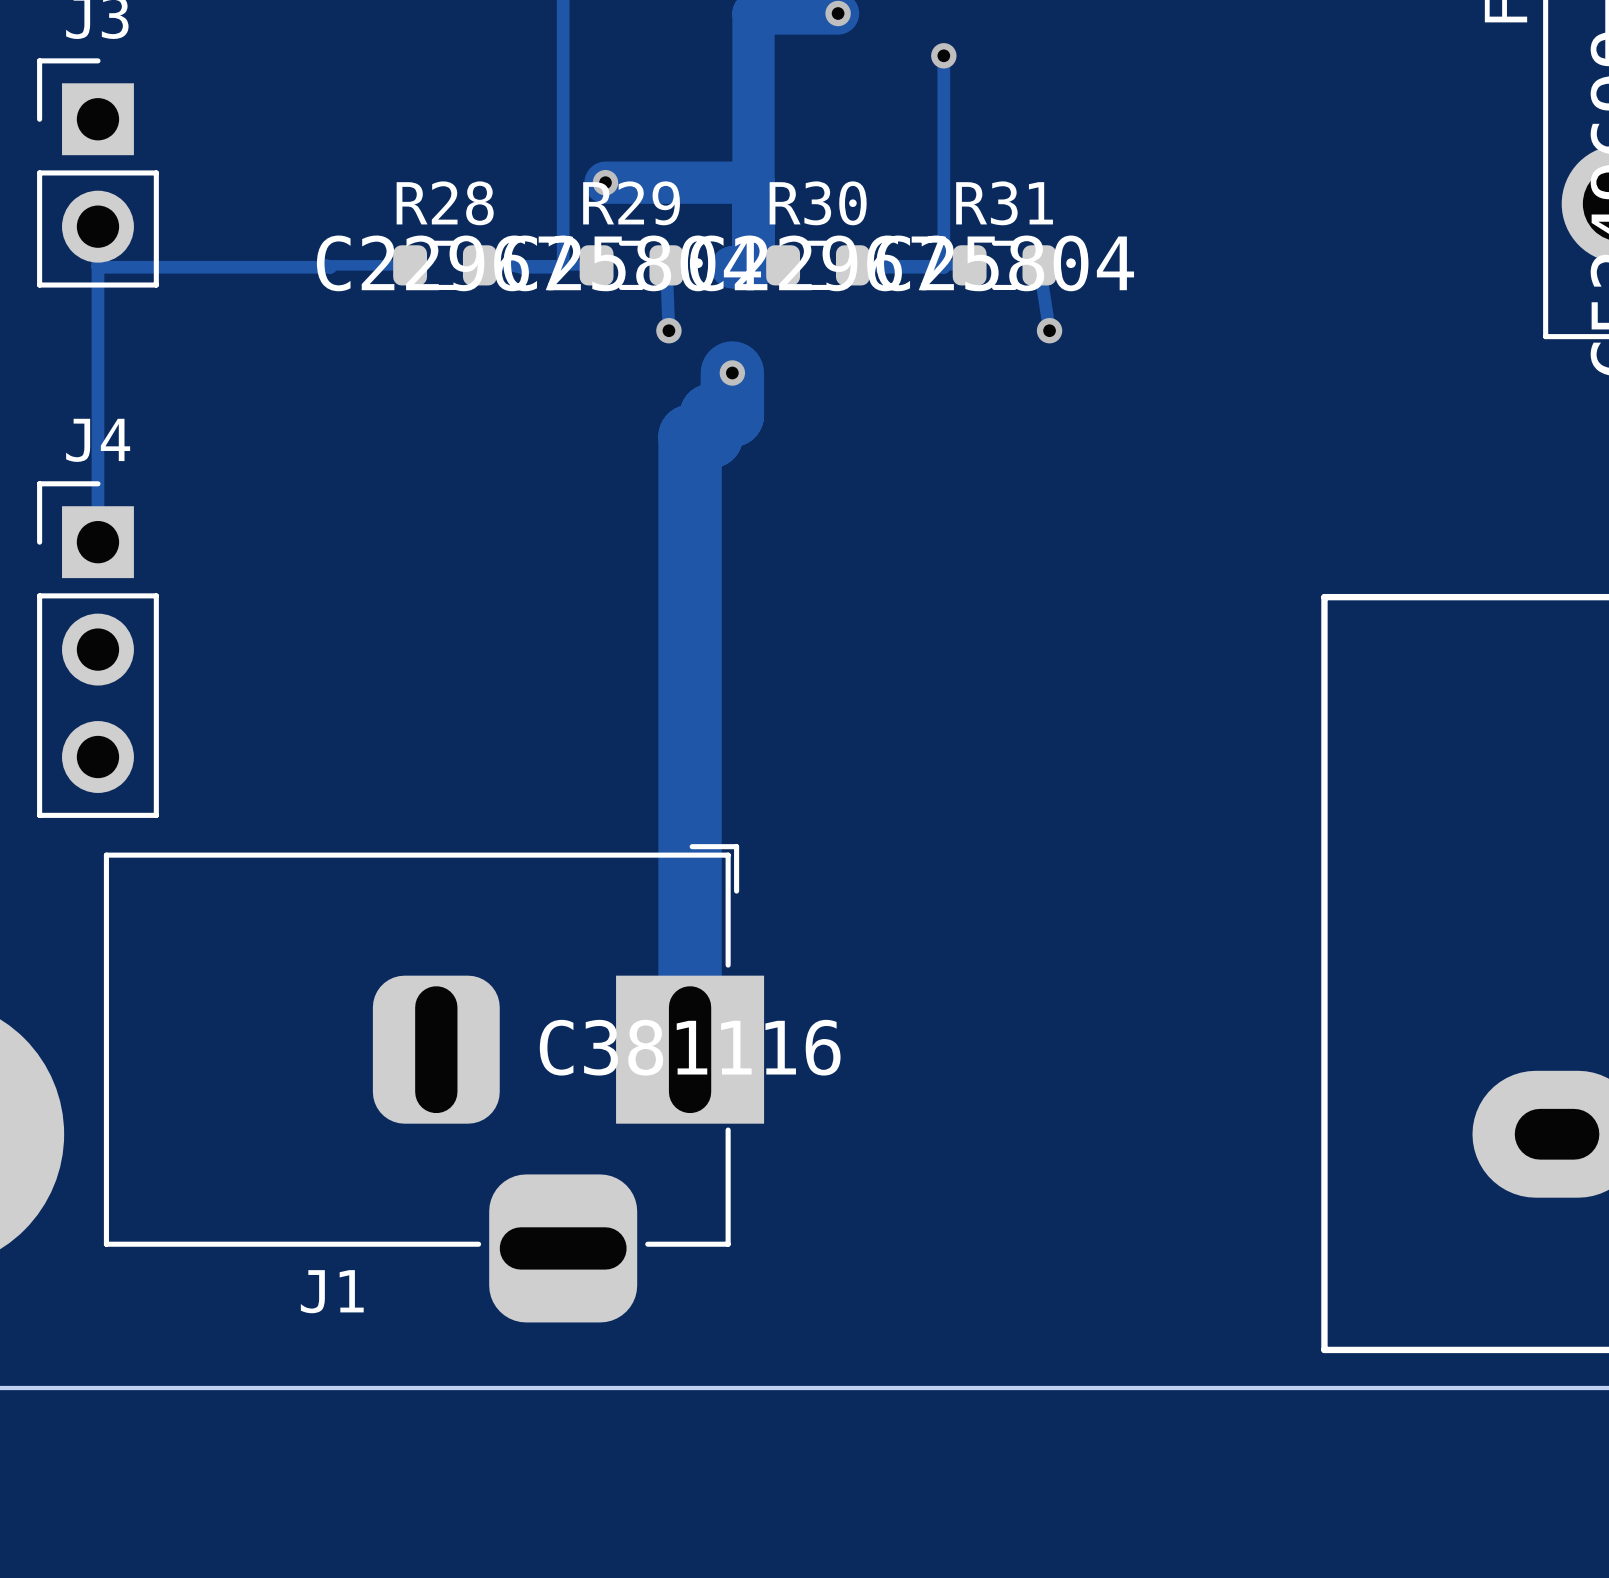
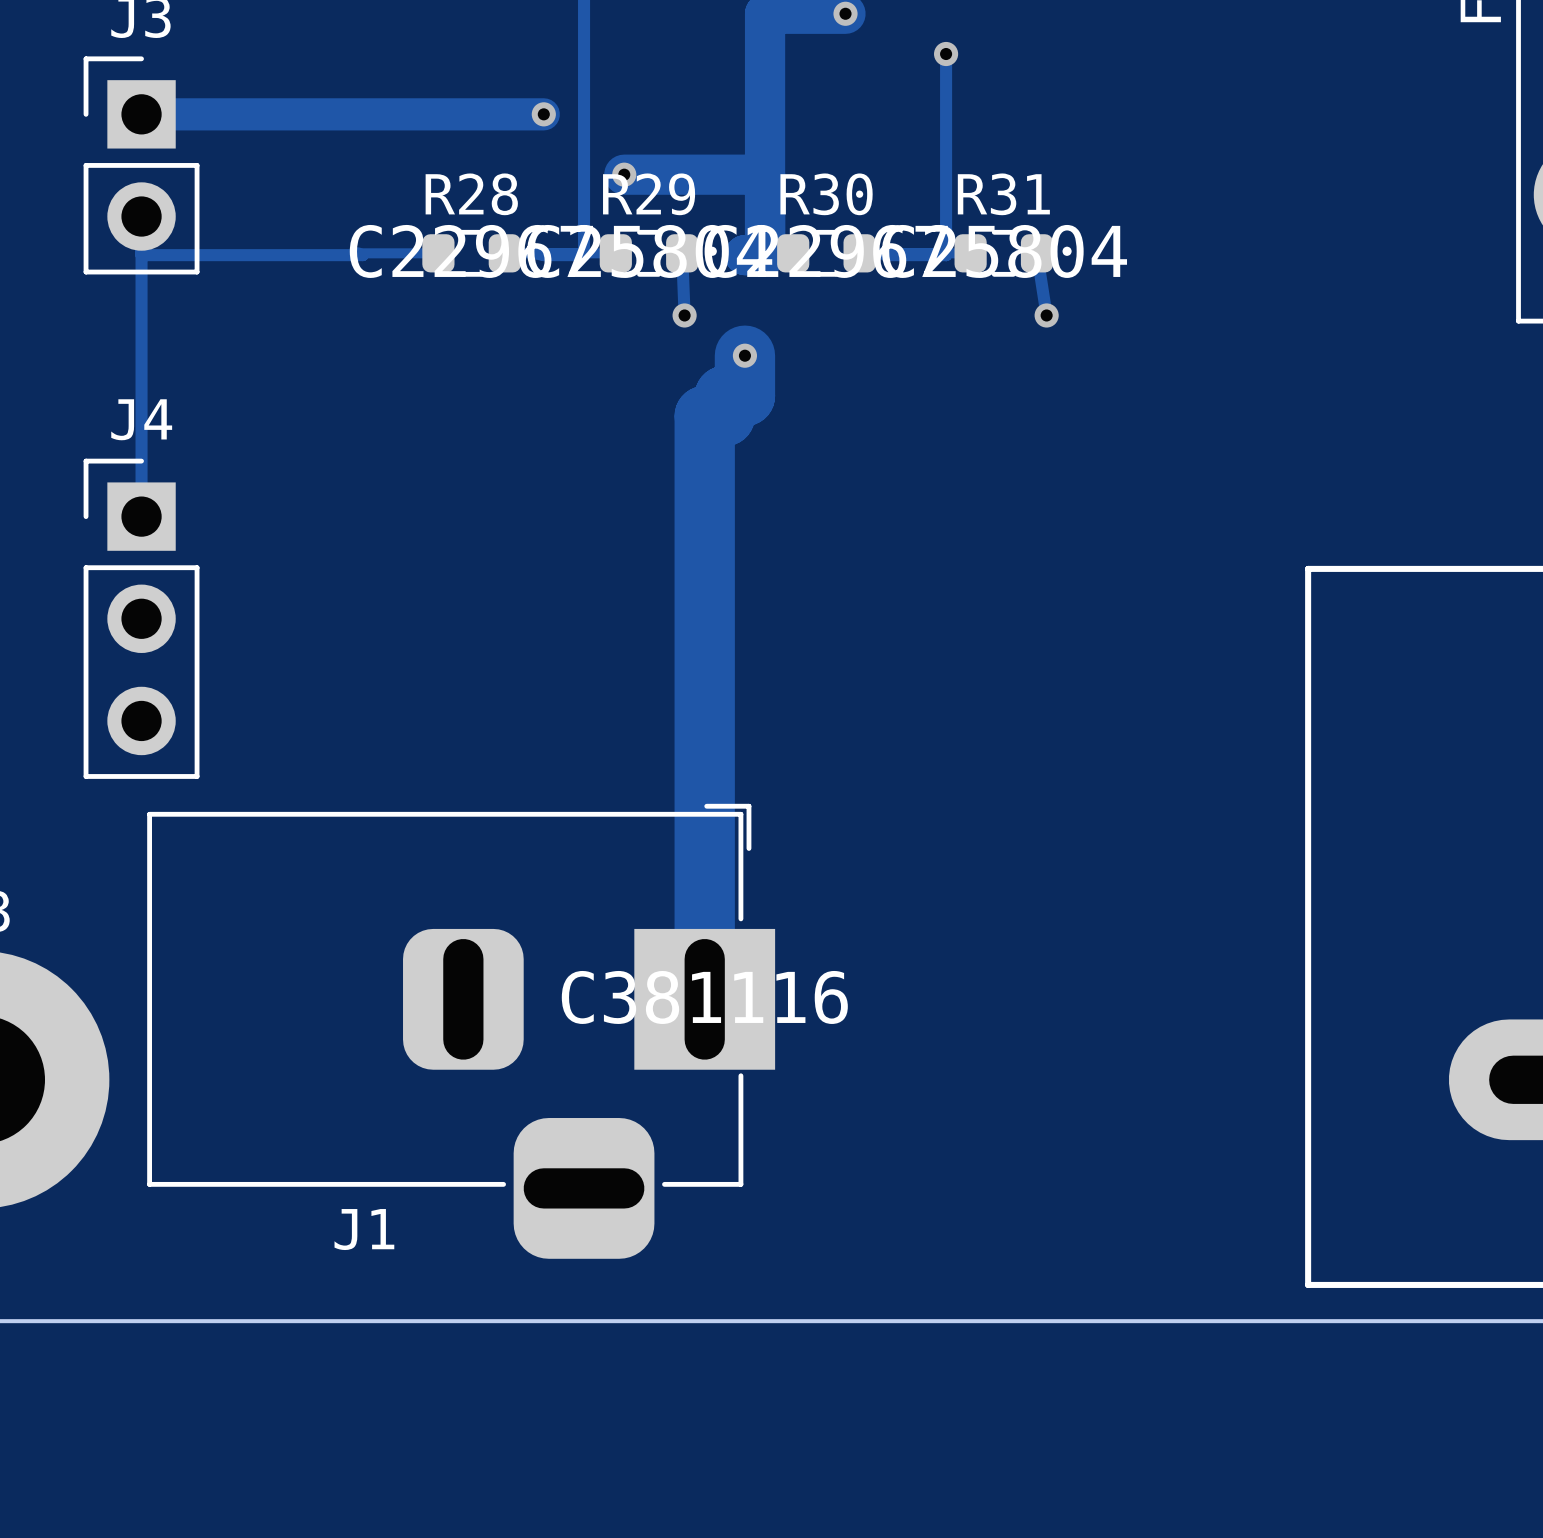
track: none -> (141, 114) (543, 114)
via: none -> (543, 114)

